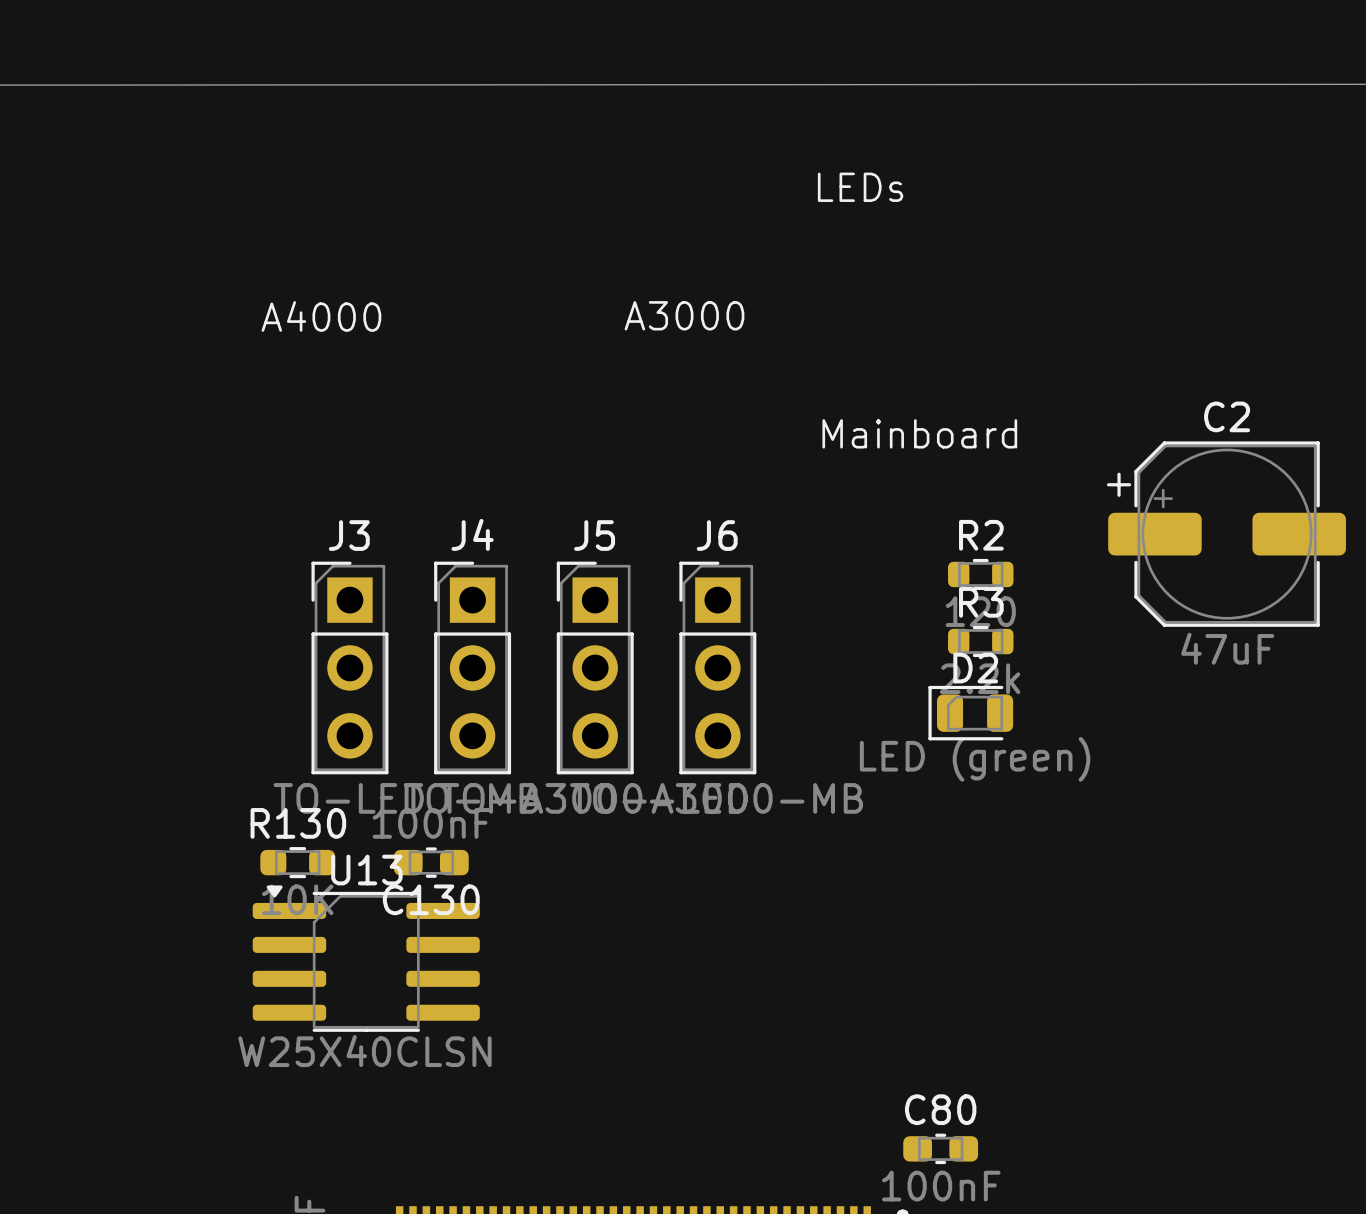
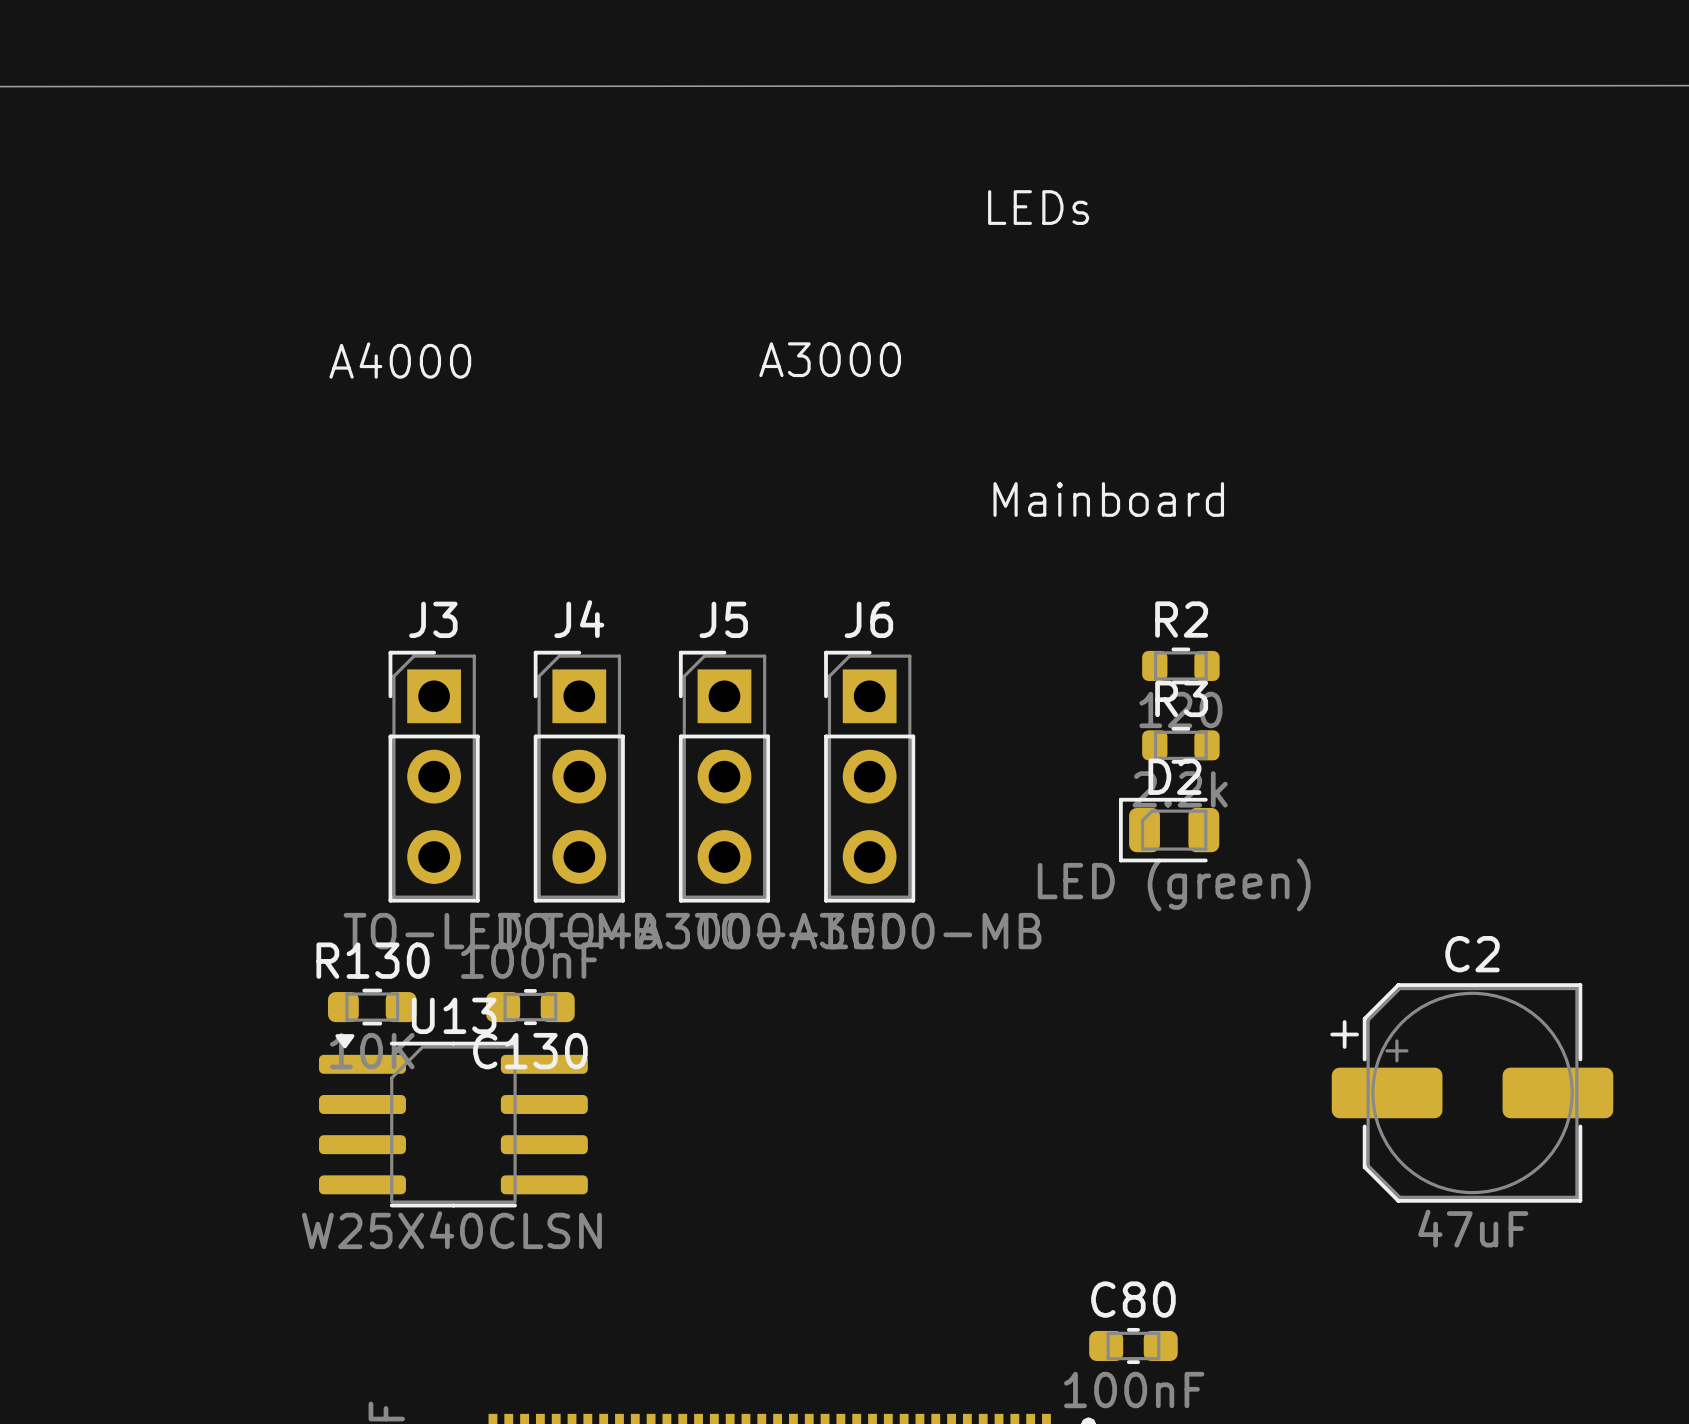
C2 footprint: [1106, 441, 1346, 627] -> [1330, 983, 1614, 1203]

